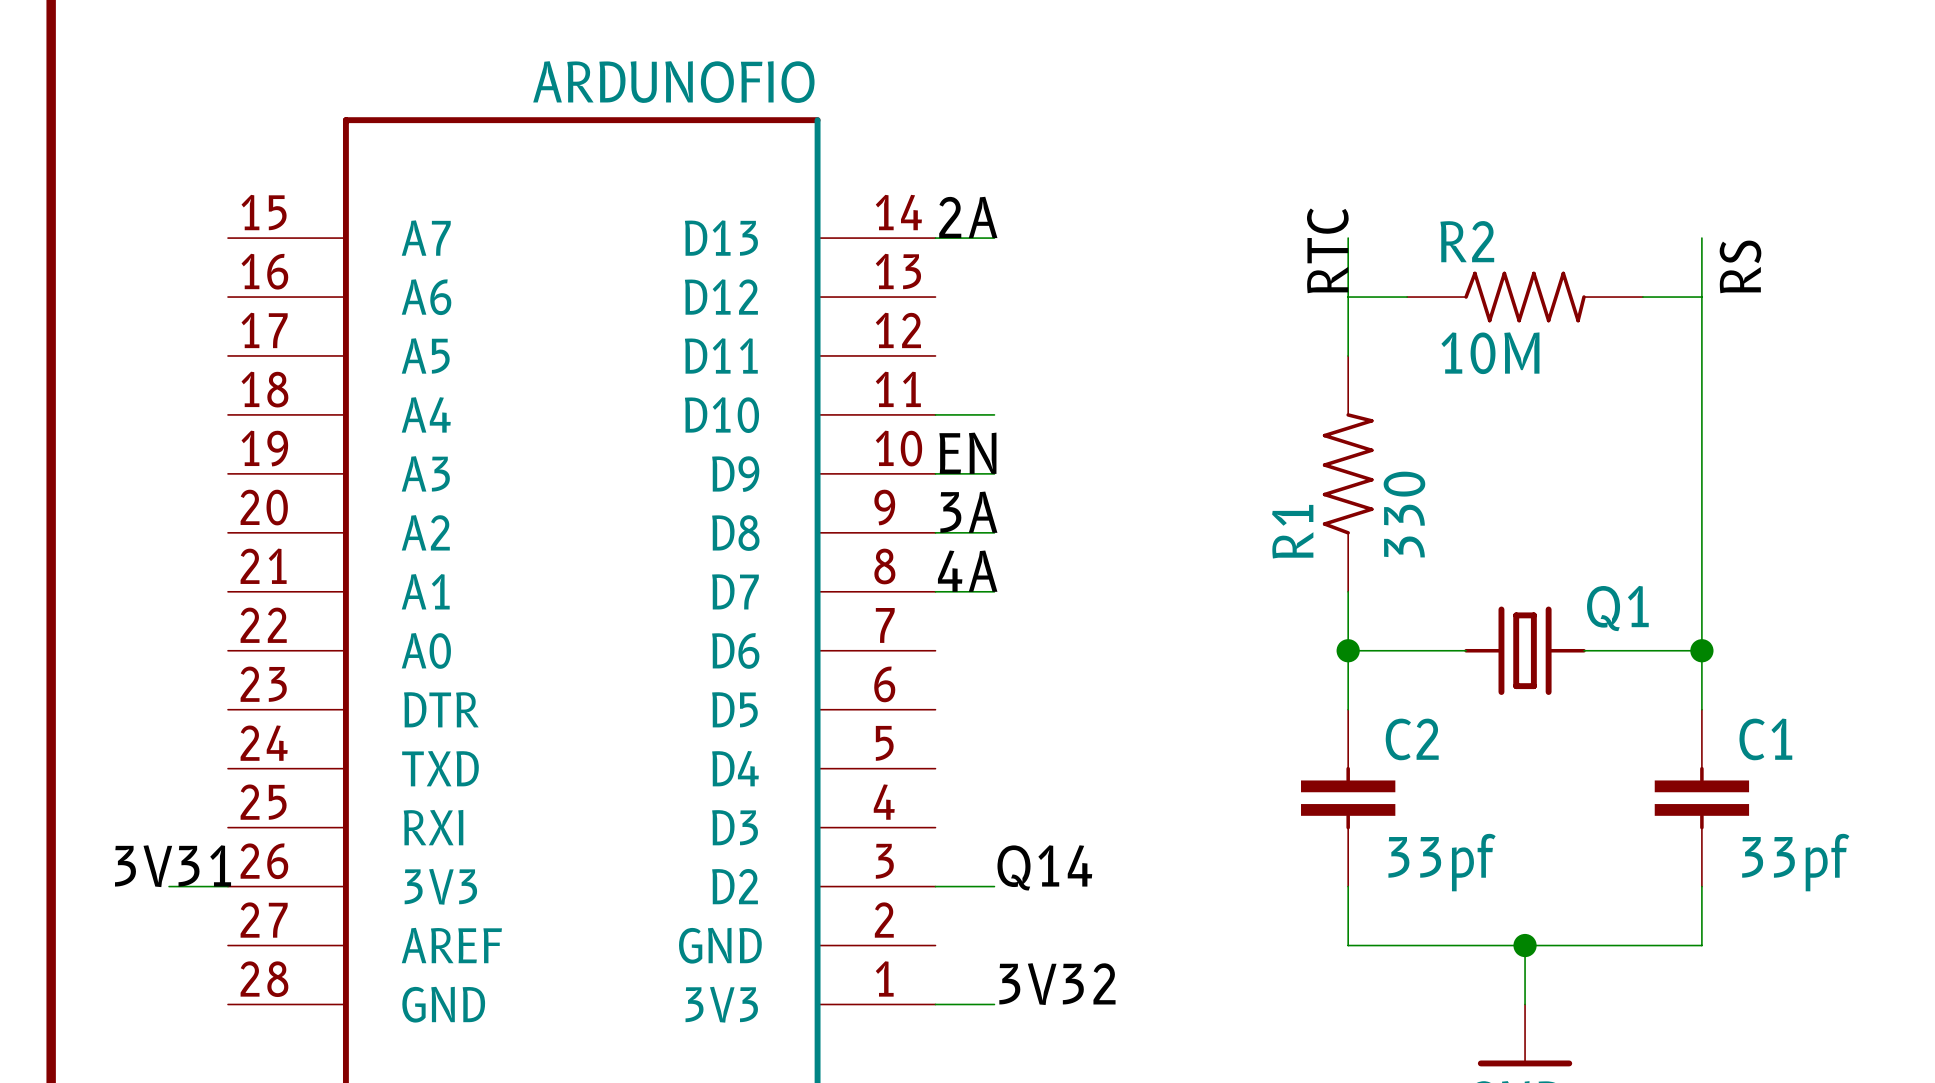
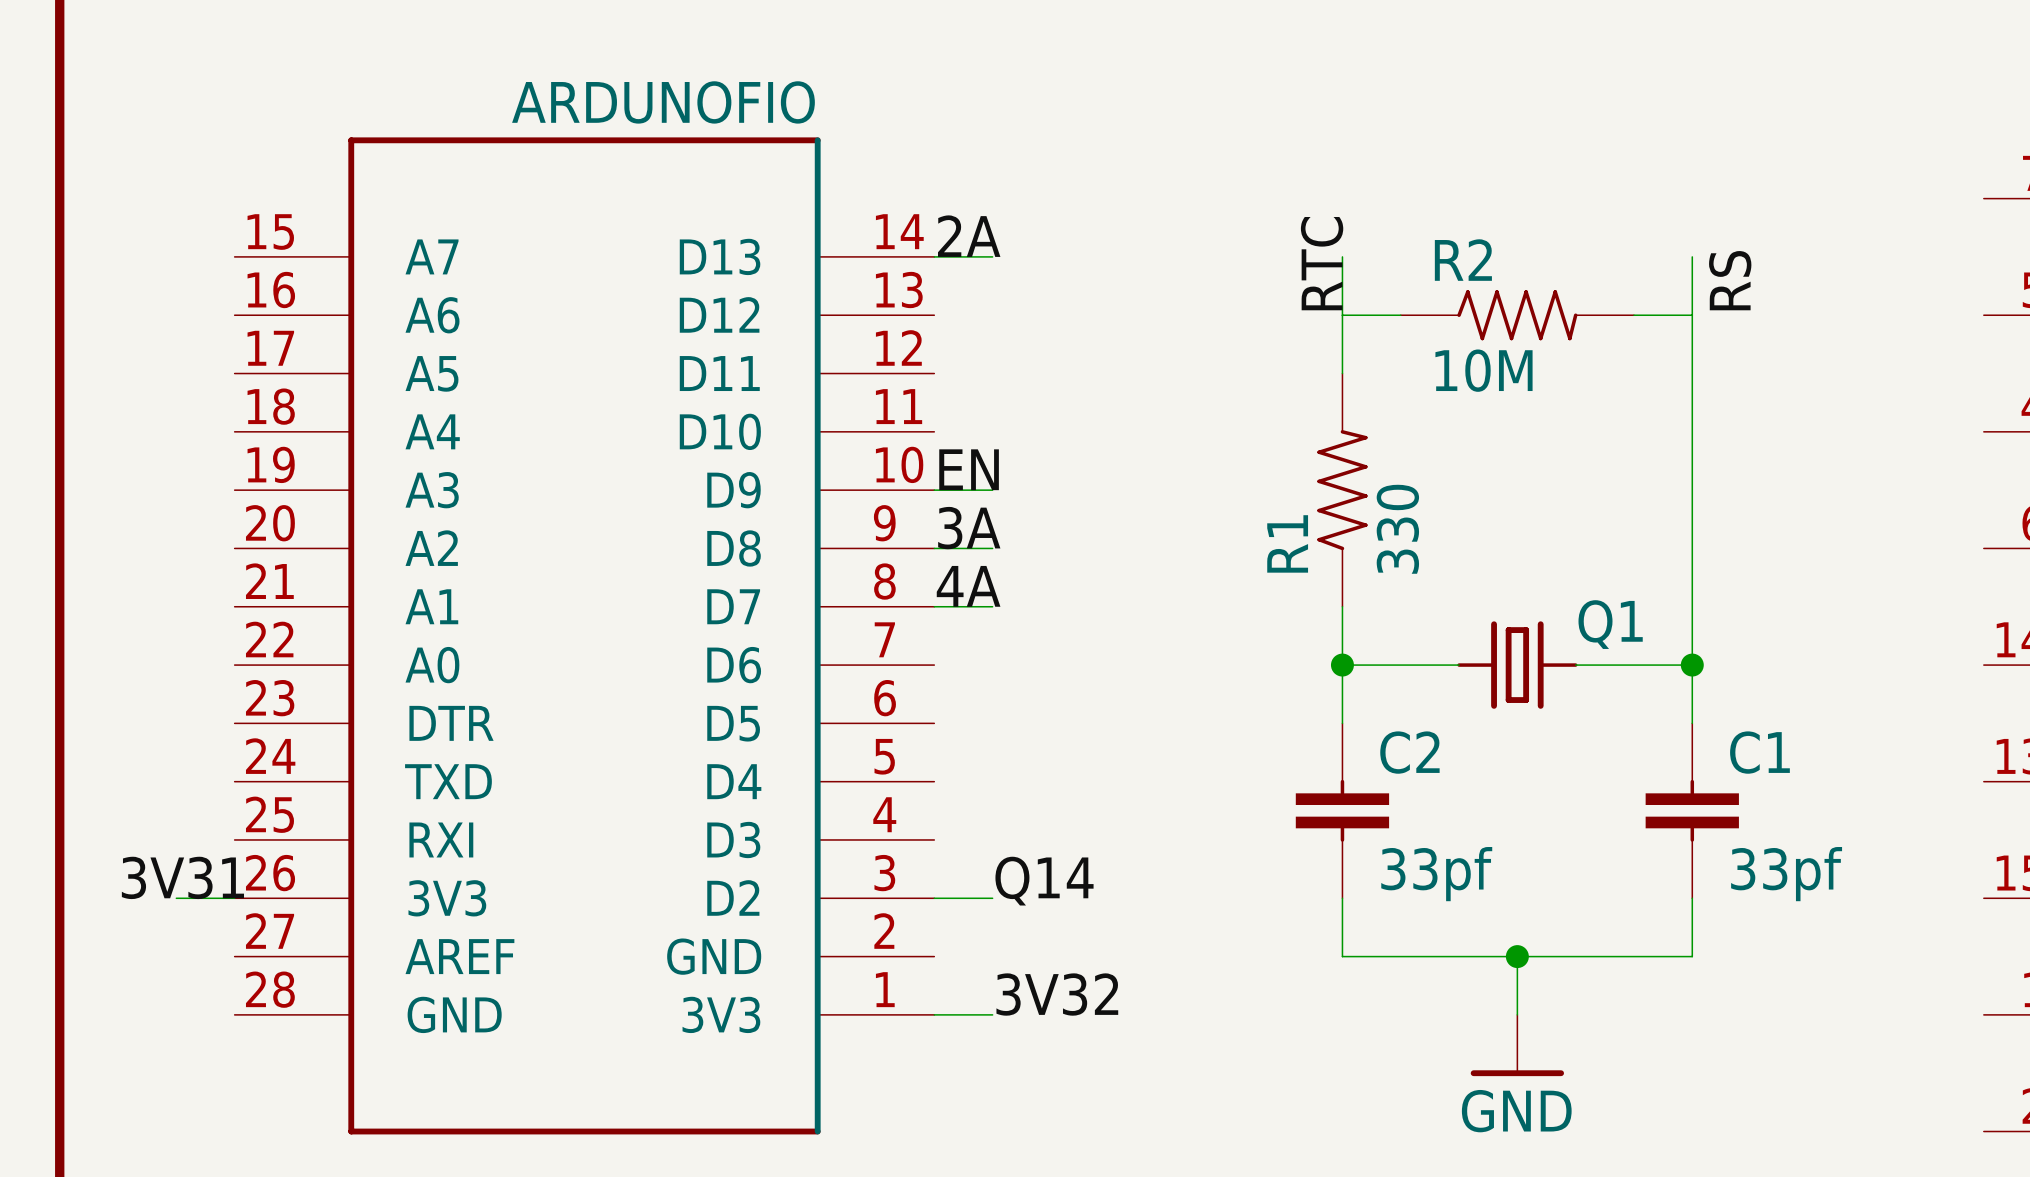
wire: (935, 414) (994, 414) -> none

